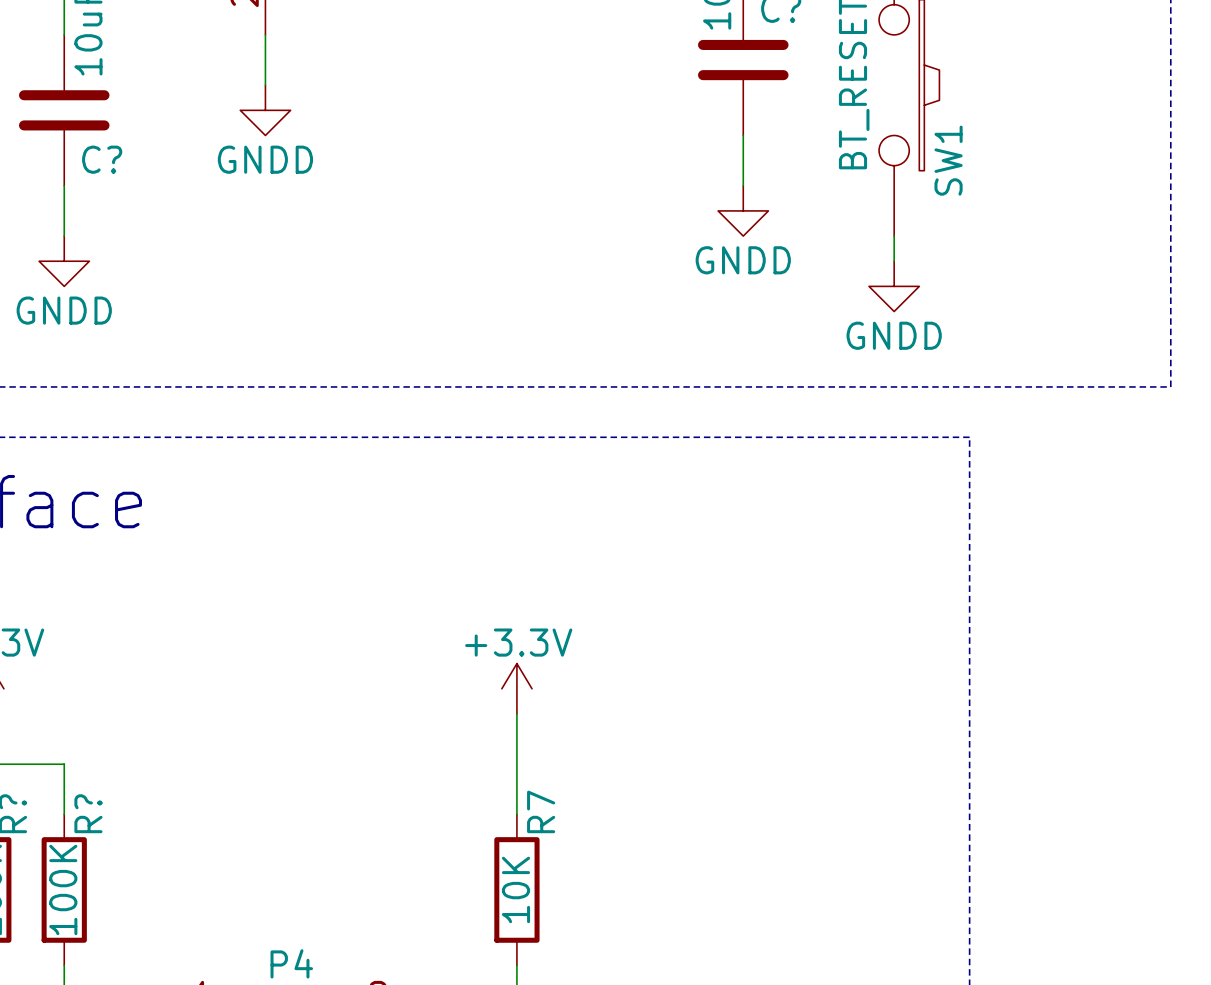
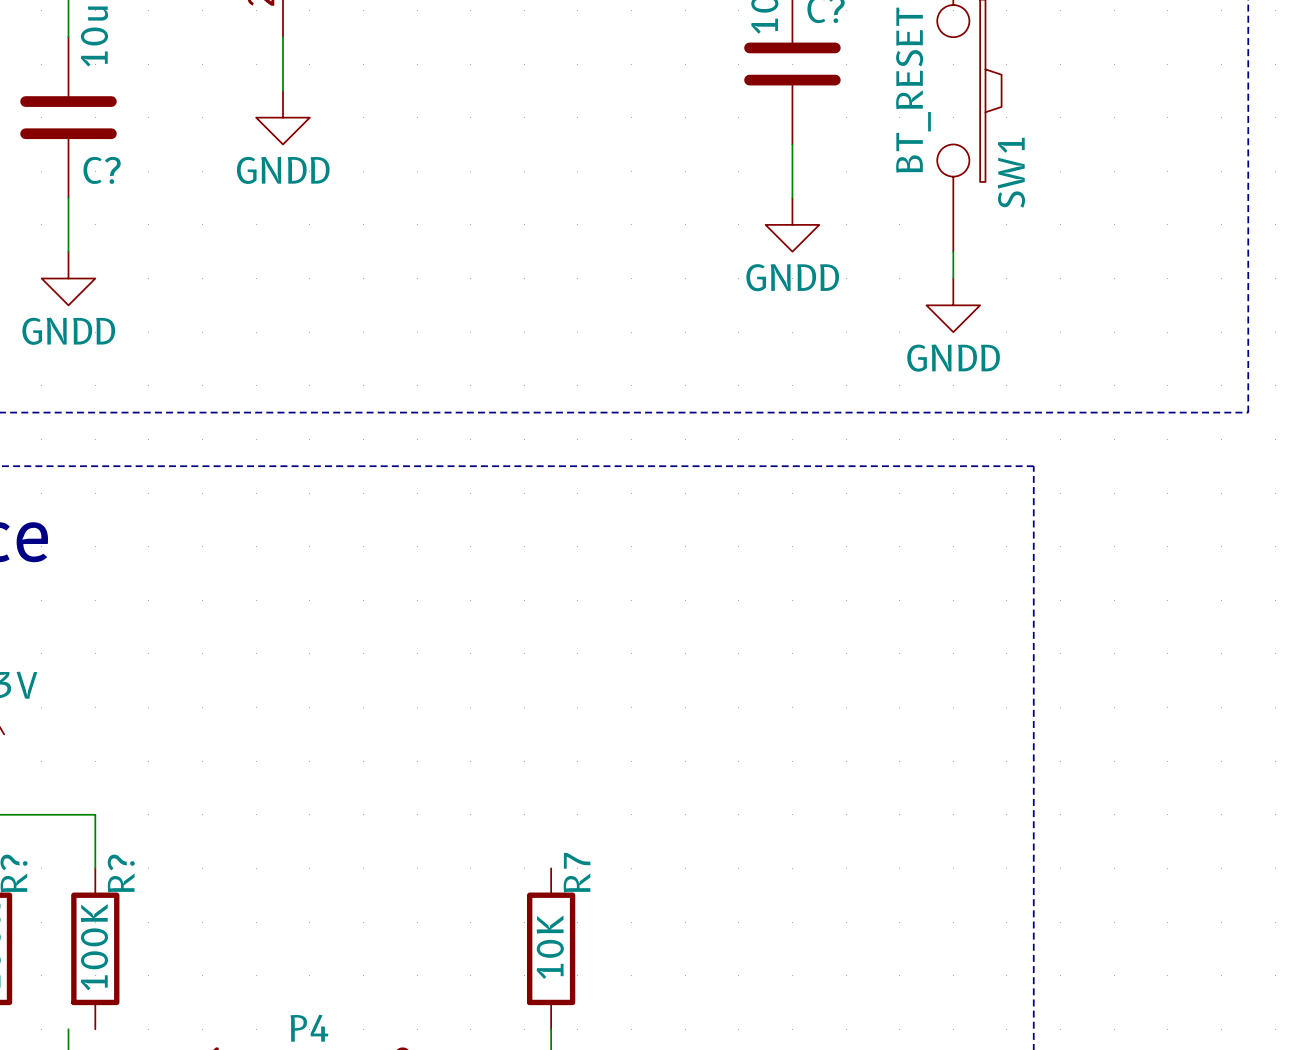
power symbol: +3.3V (516, 688) -> none
wire: (516, 713) (516, 814) -> none
wire: (64, 764) (64, 814) -> (68, 814) (95, 814) (95, 868)
R? position: (64, 889) -> (95, 948)

